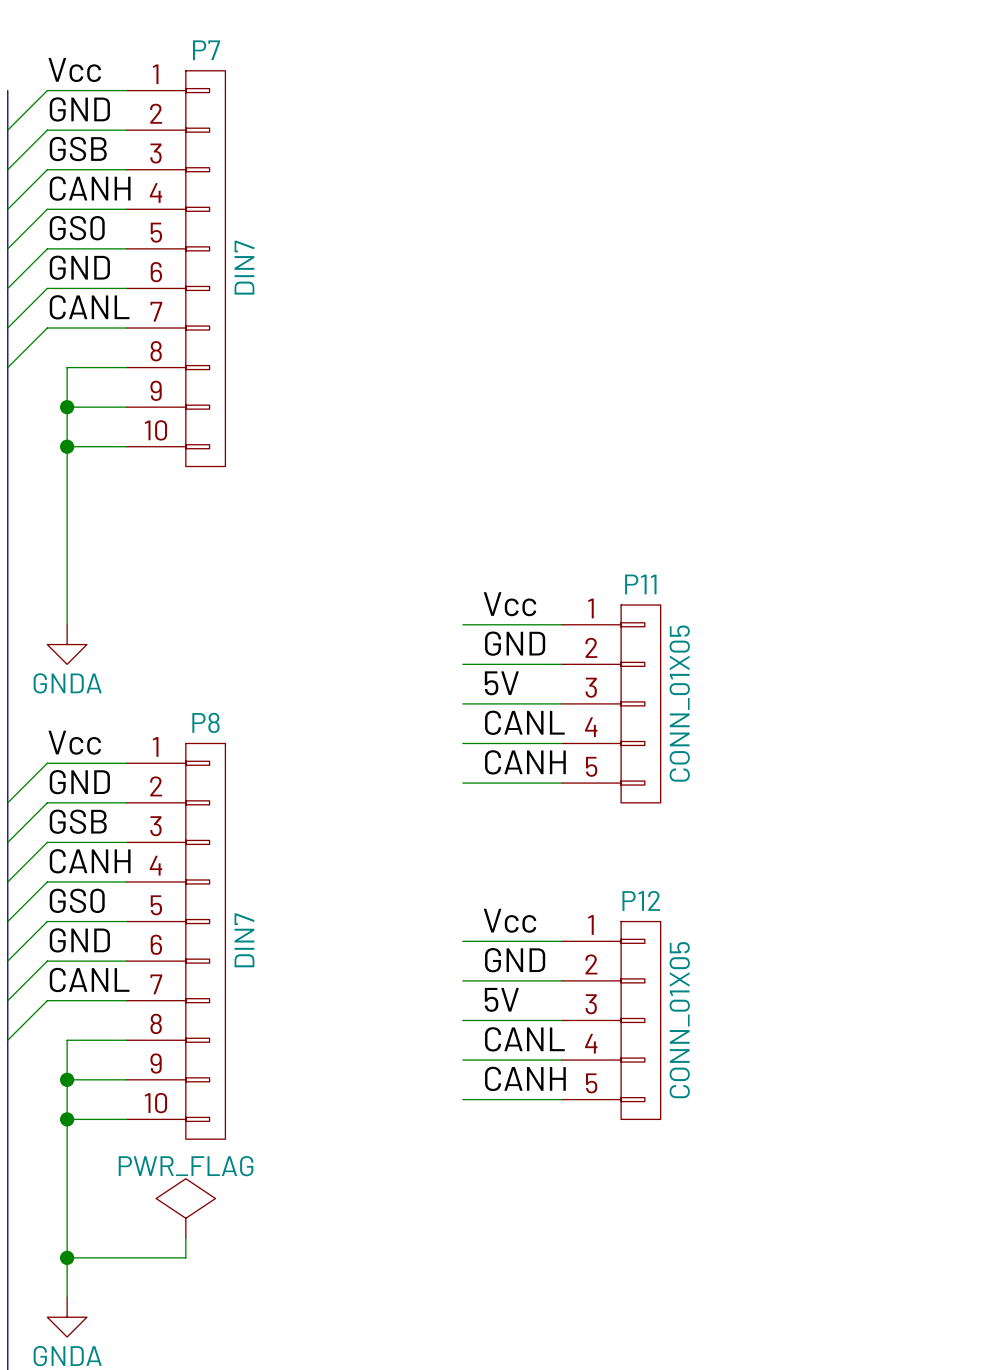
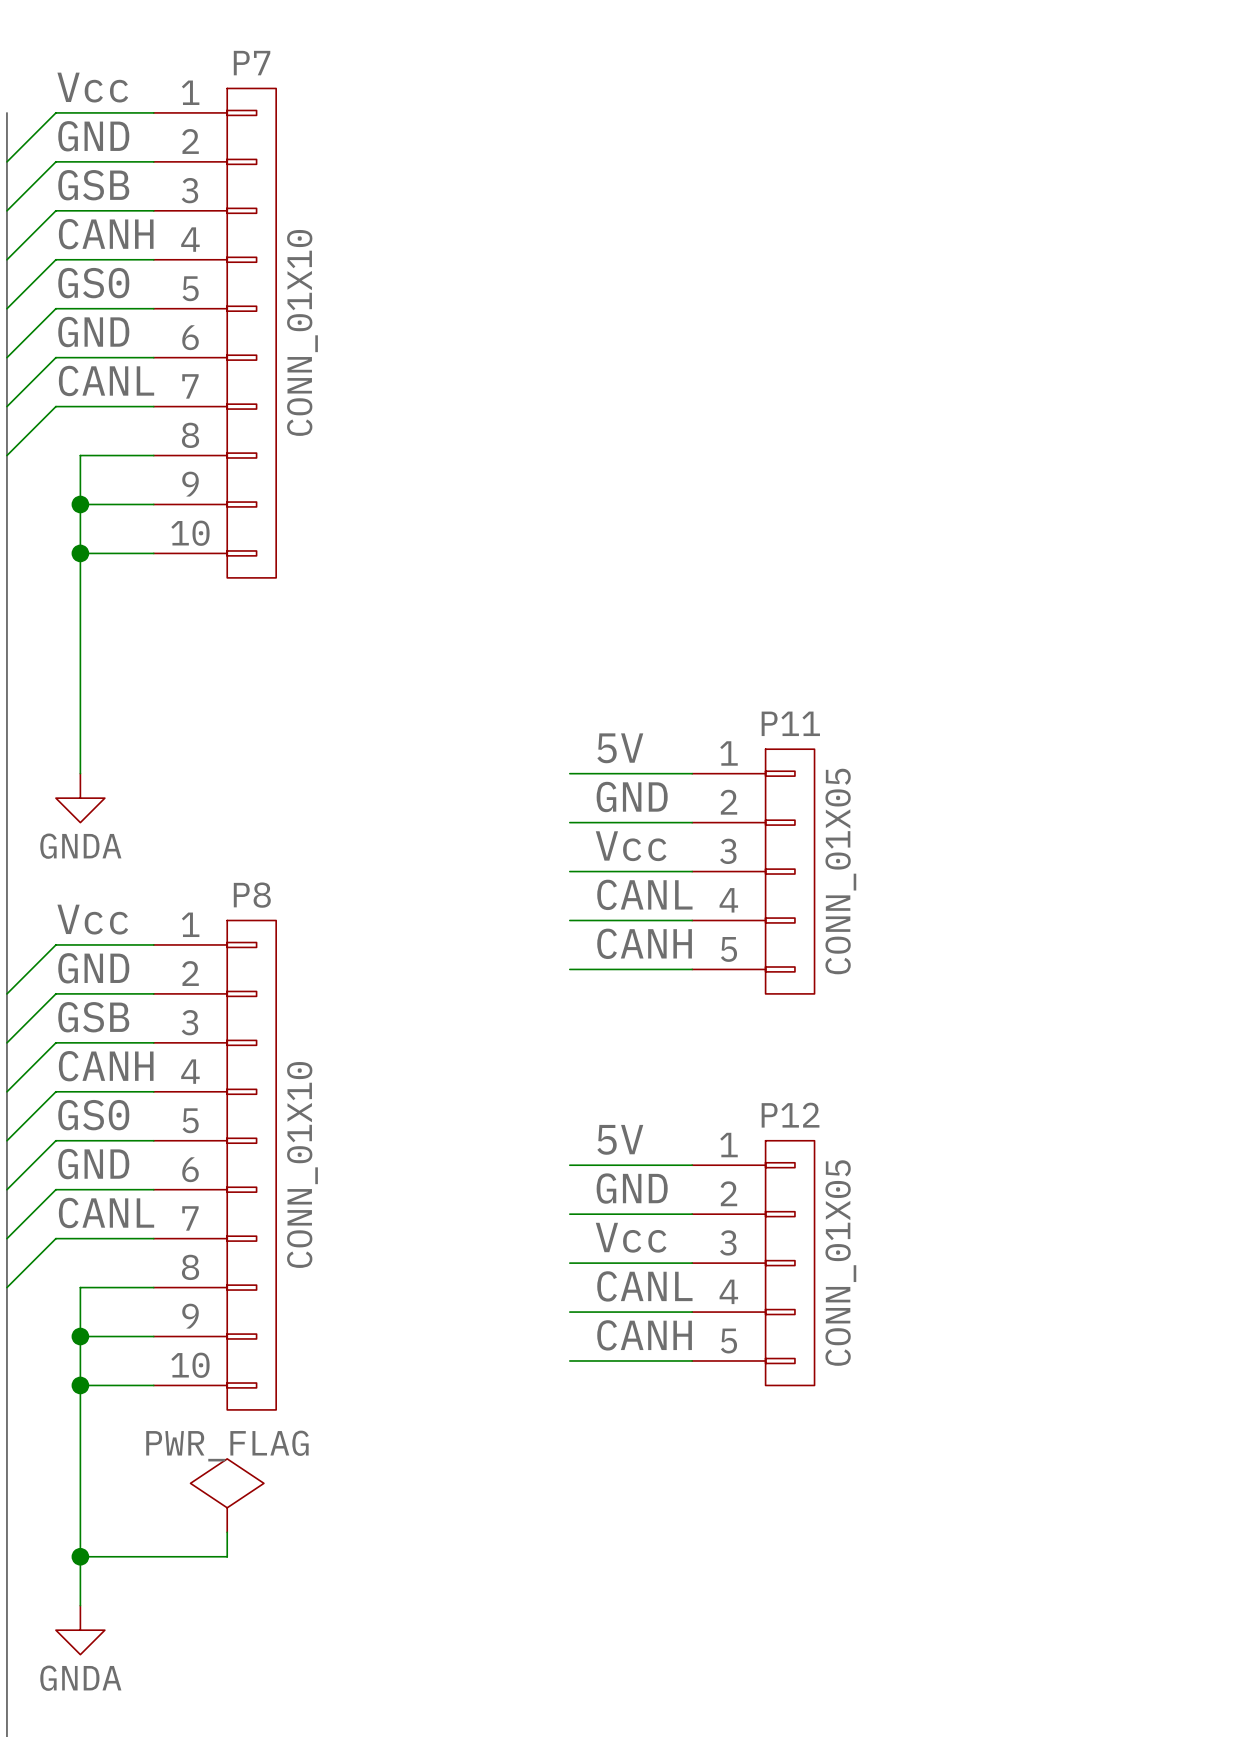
P7 value: DIN7 (244, 267) -> CONN_01X10 (302, 332)
label: Vcc (510, 604) -> 5V (620, 748)
label: 5V (501, 683) -> Vcc (631, 846)
label: Vcc (510, 920) -> 5V (620, 1139)
P8 value: DIN7 (244, 940) -> CONN_01X10 (302, 1164)
label: 5V (501, 999) -> Vcc (631, 1237)

